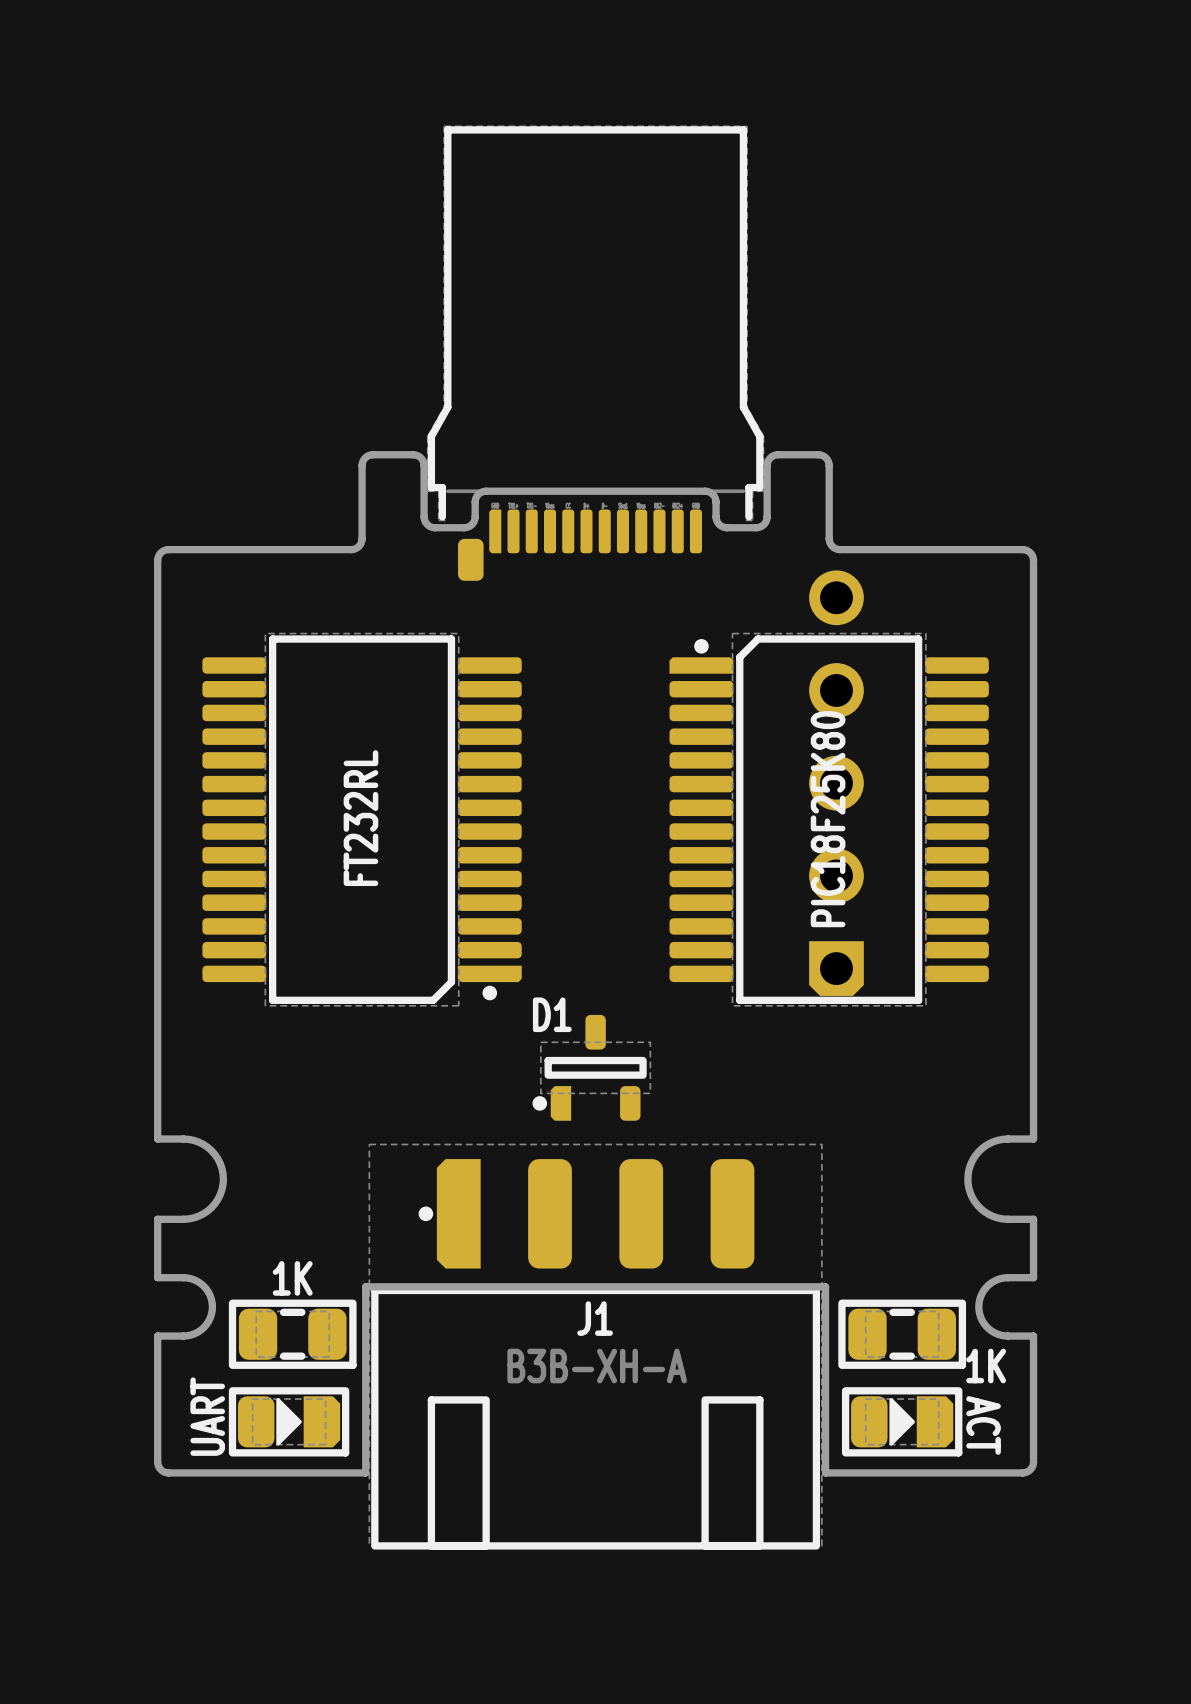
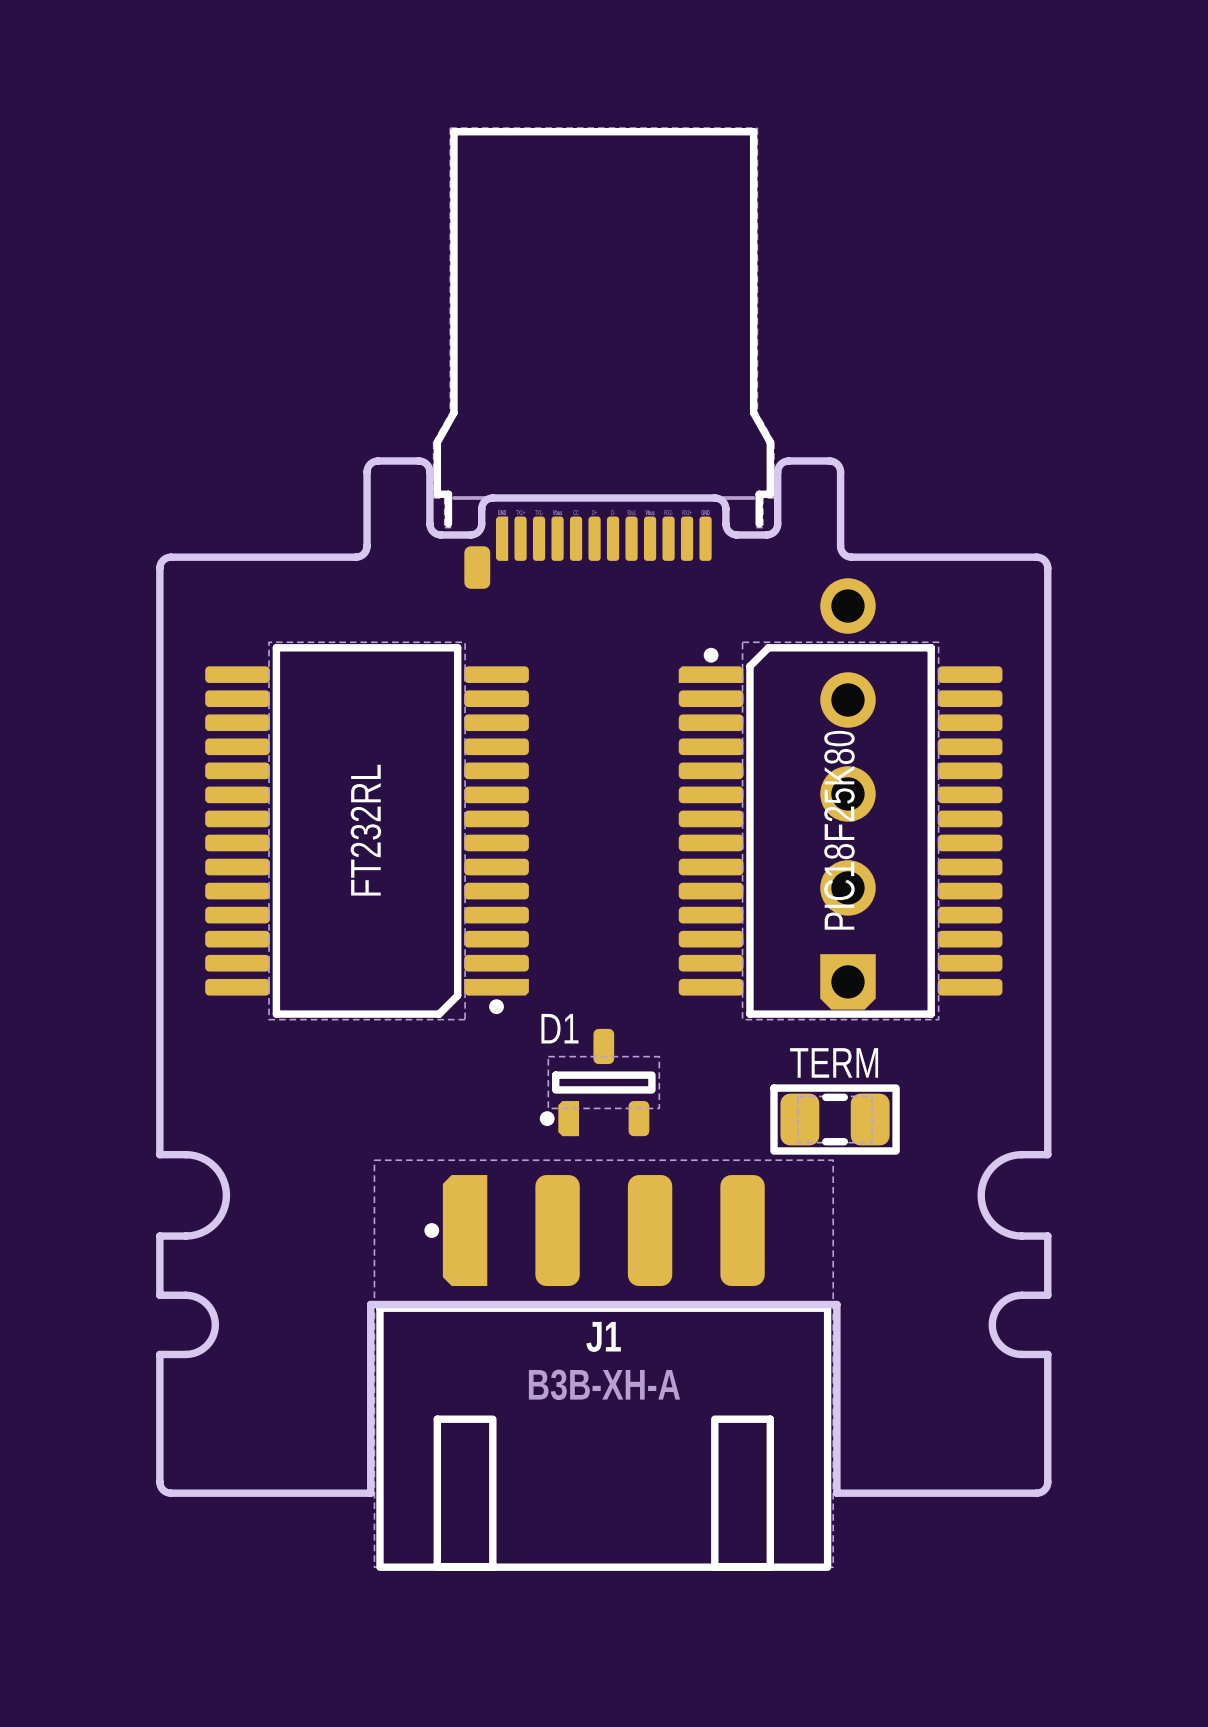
part: none -> TERM (835, 1119)
part: 1K (292, 1334) -> none
part: 1K (902, 1334) -> none
part: UART (289, 1421) -> none
part: ACT (902, 1421) -> none

